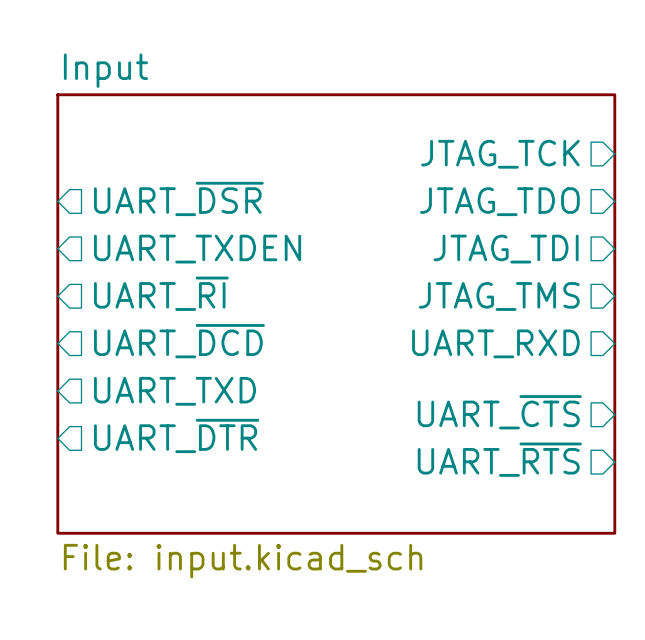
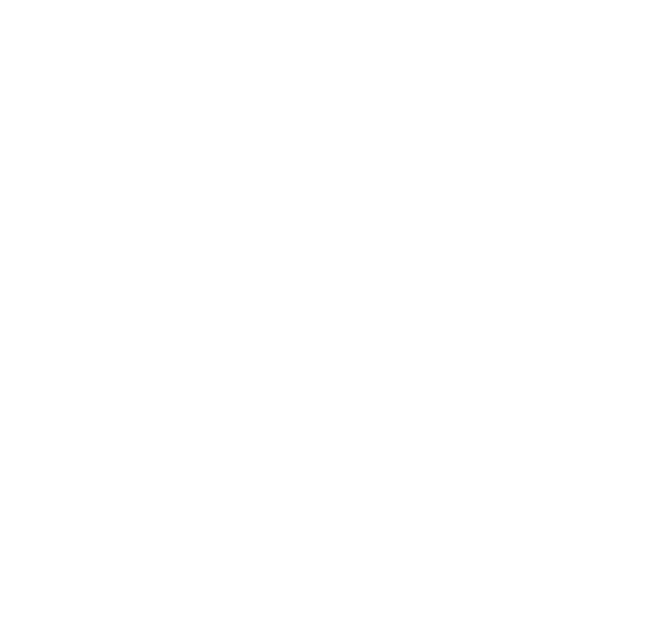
sheet pin: JTAG_TCK (500, 154) -> none
sheet pin: UART_~{DSR} (178, 198) -> none
sheet pin: JTAG_TDO (499, 201) -> none
sheet pin: UART_TXDEN (197, 249) -> none
sheet pin: JTAG_TDI (506, 249) -> none
sheet pin: UART_~{RI} (161, 293) -> none
sheet pin: JTAG_TMS (499, 296) -> none
sheet Input: File: input.kicad_sch (336, 314) -> none
sheet pin: UART_~{DCD} (179, 341) -> none
sheet pin: UART_RXD (495, 343) -> none
sheet pin: UART_TXD (174, 391) -> none
sheet pin: UART_~{CTS} (499, 412) -> none
sheet pin: UART_~{DTR} (176, 435) -> none
sheet pin: UART_~{RTS} (499, 459) -> none

